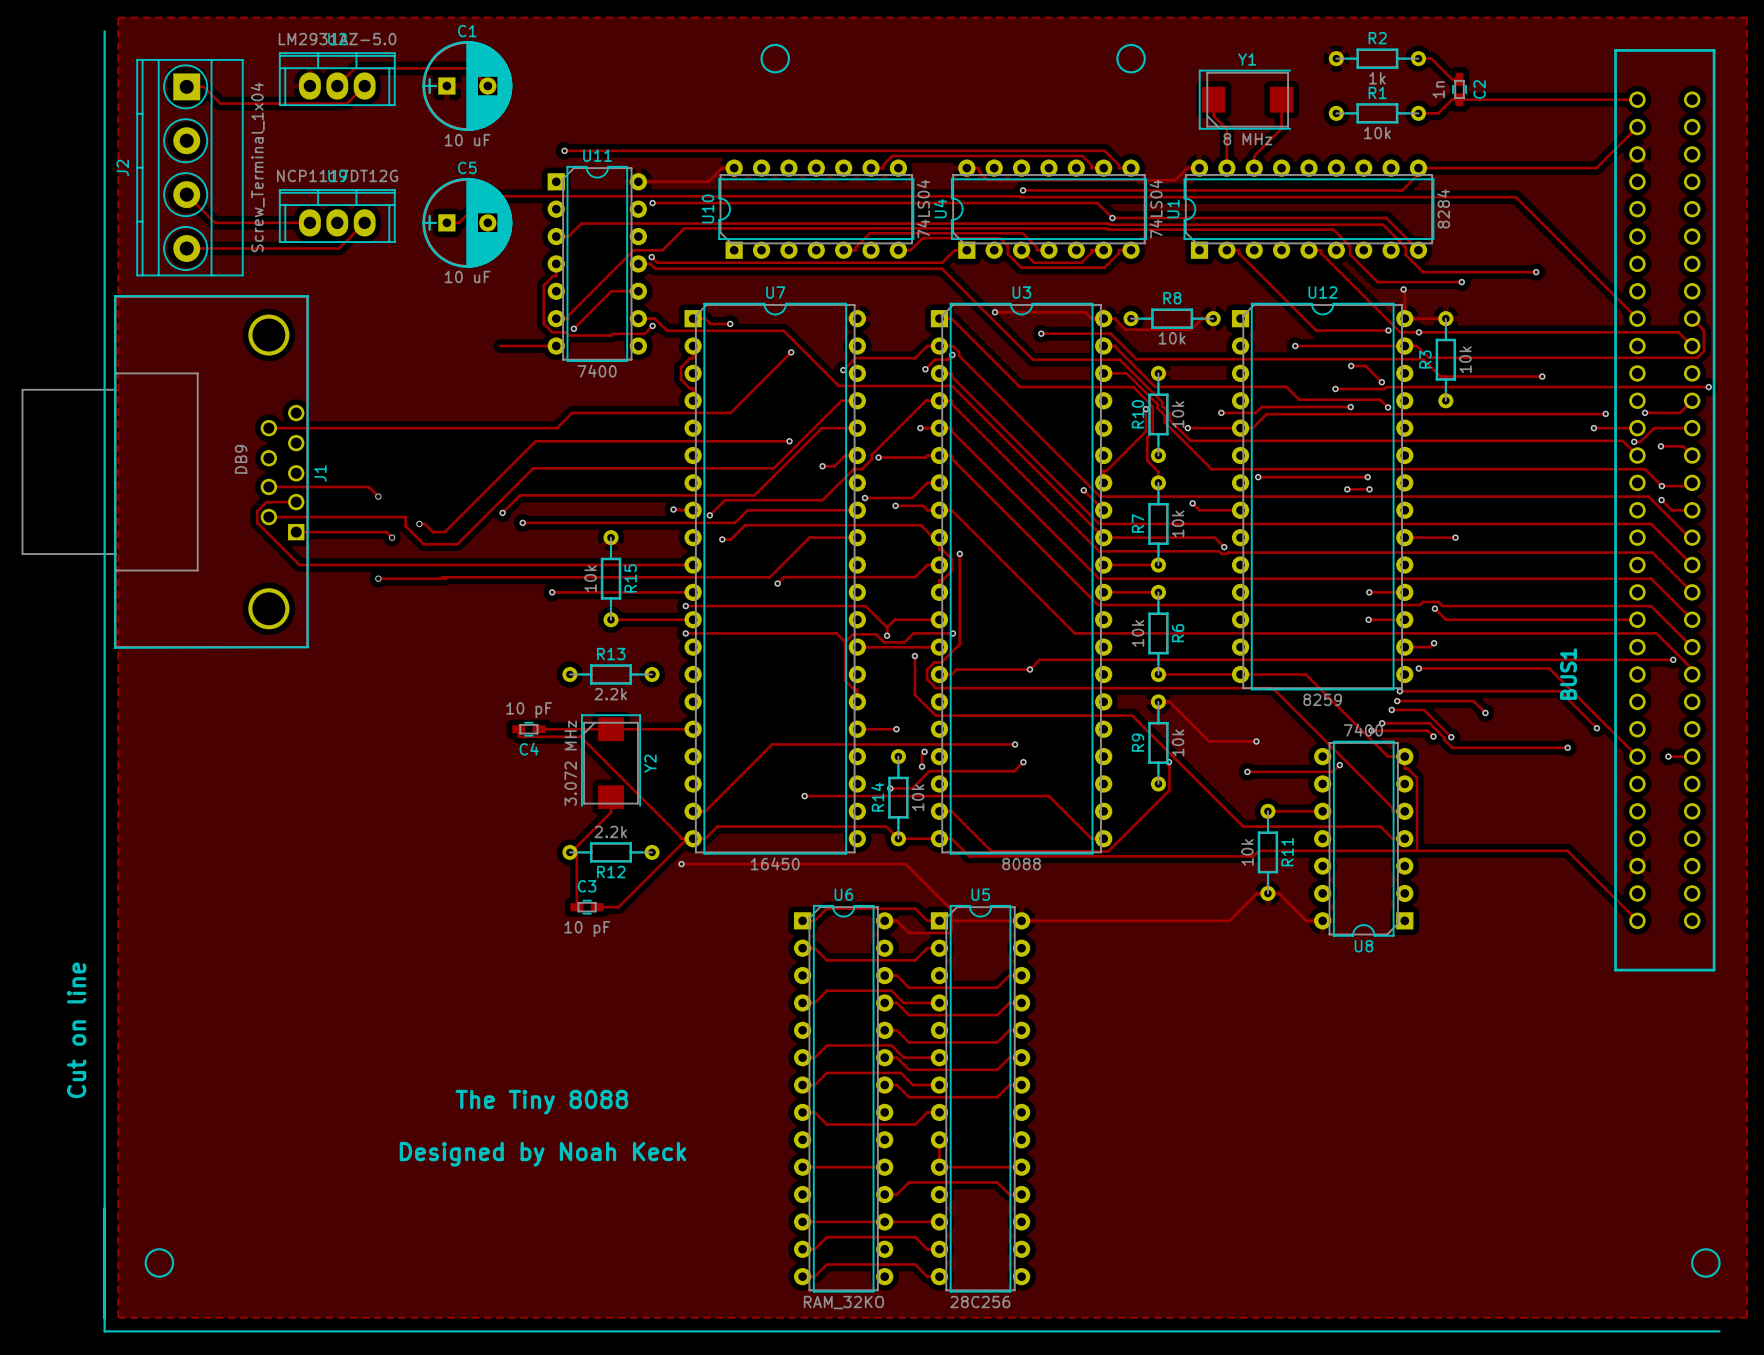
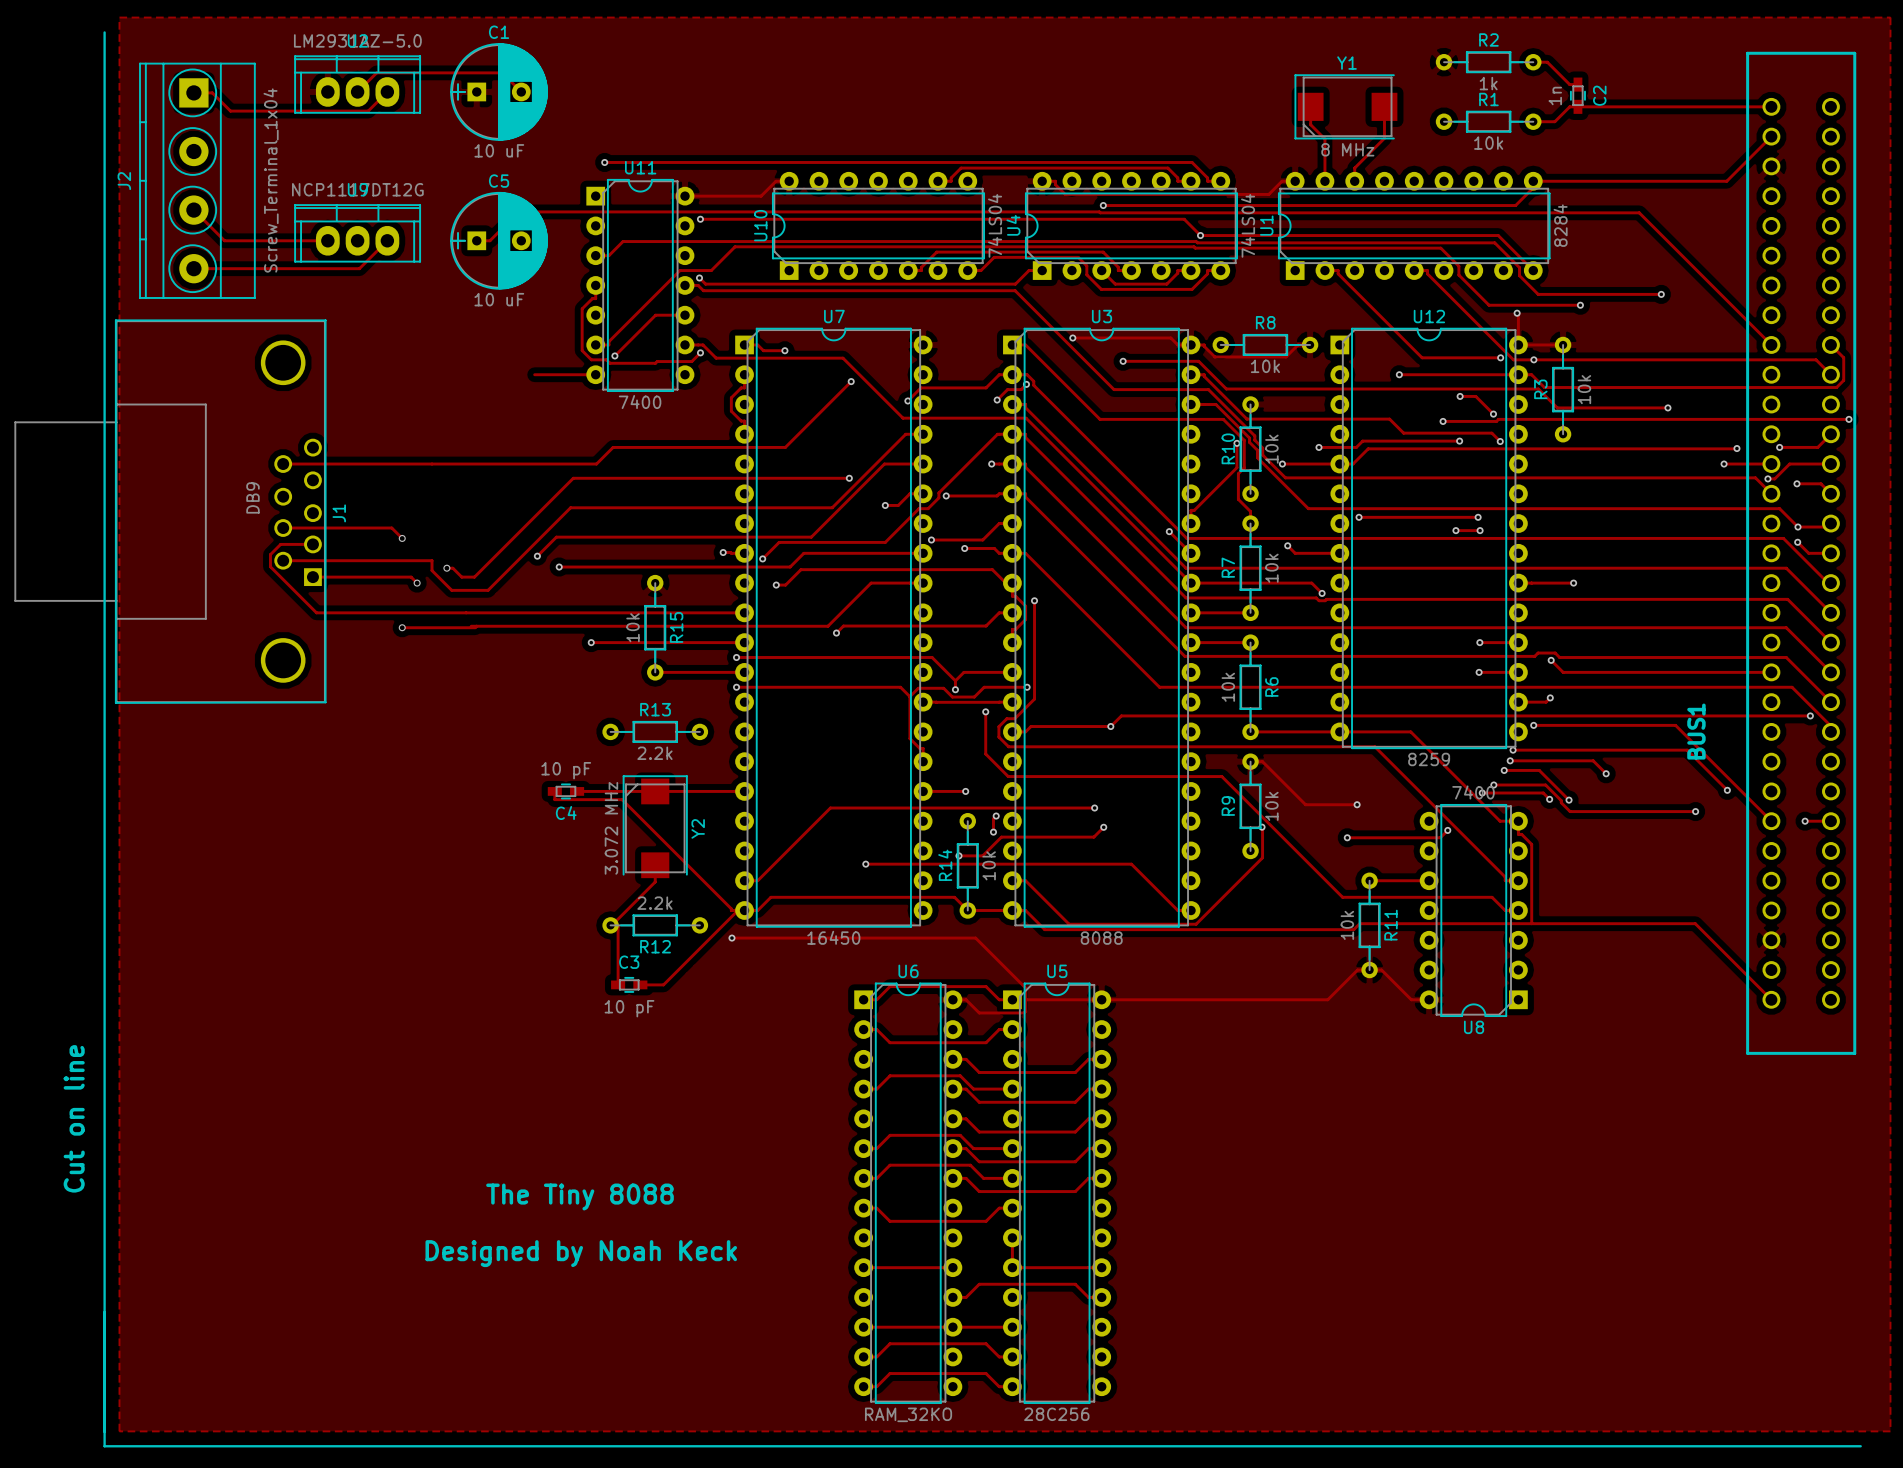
drawing: [760, 43, 790, 74] -> none
drawing: [1116, 43, 1146, 74] -> none
drawing: [144, 1248, 175, 1278] -> none
drawing: [1691, 1248, 1721, 1278] -> none

